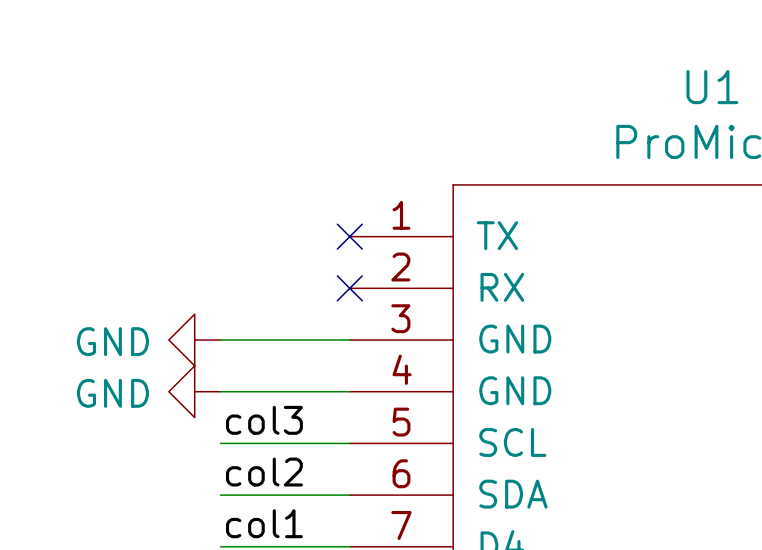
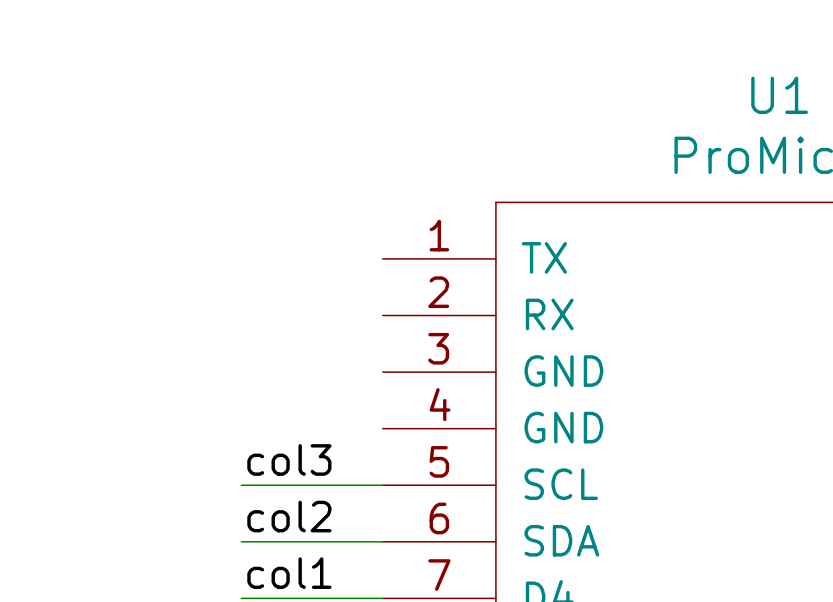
no-connect mark: (349, 236) -> none
no-connect mark: (349, 288) -> none
power symbol: GND (194, 340) -> none
wire: (220, 340) (349, 340) -> none
power symbol: GND (194, 391) -> none
wire: (220, 391) (349, 391) -> none

